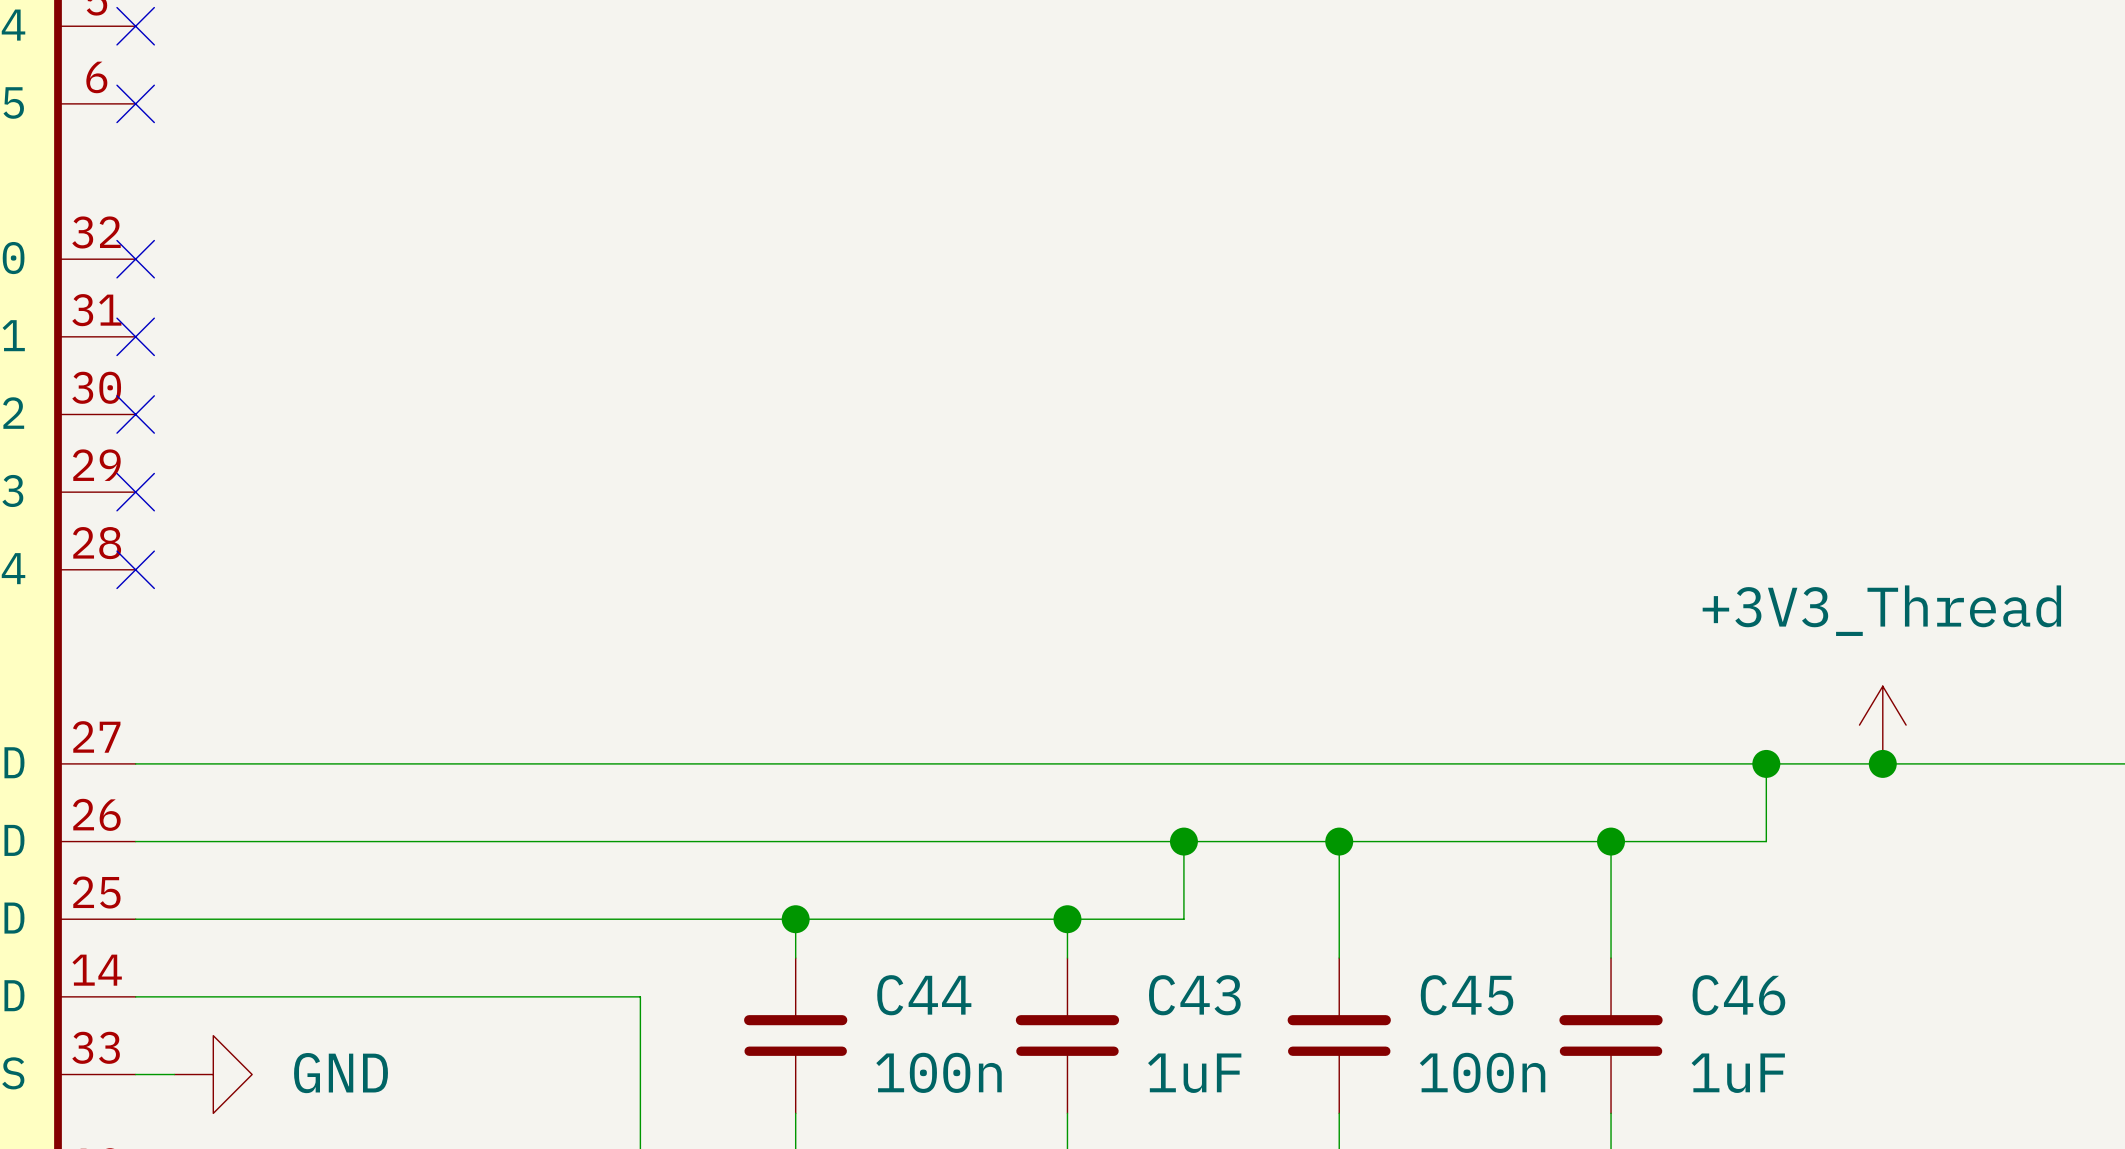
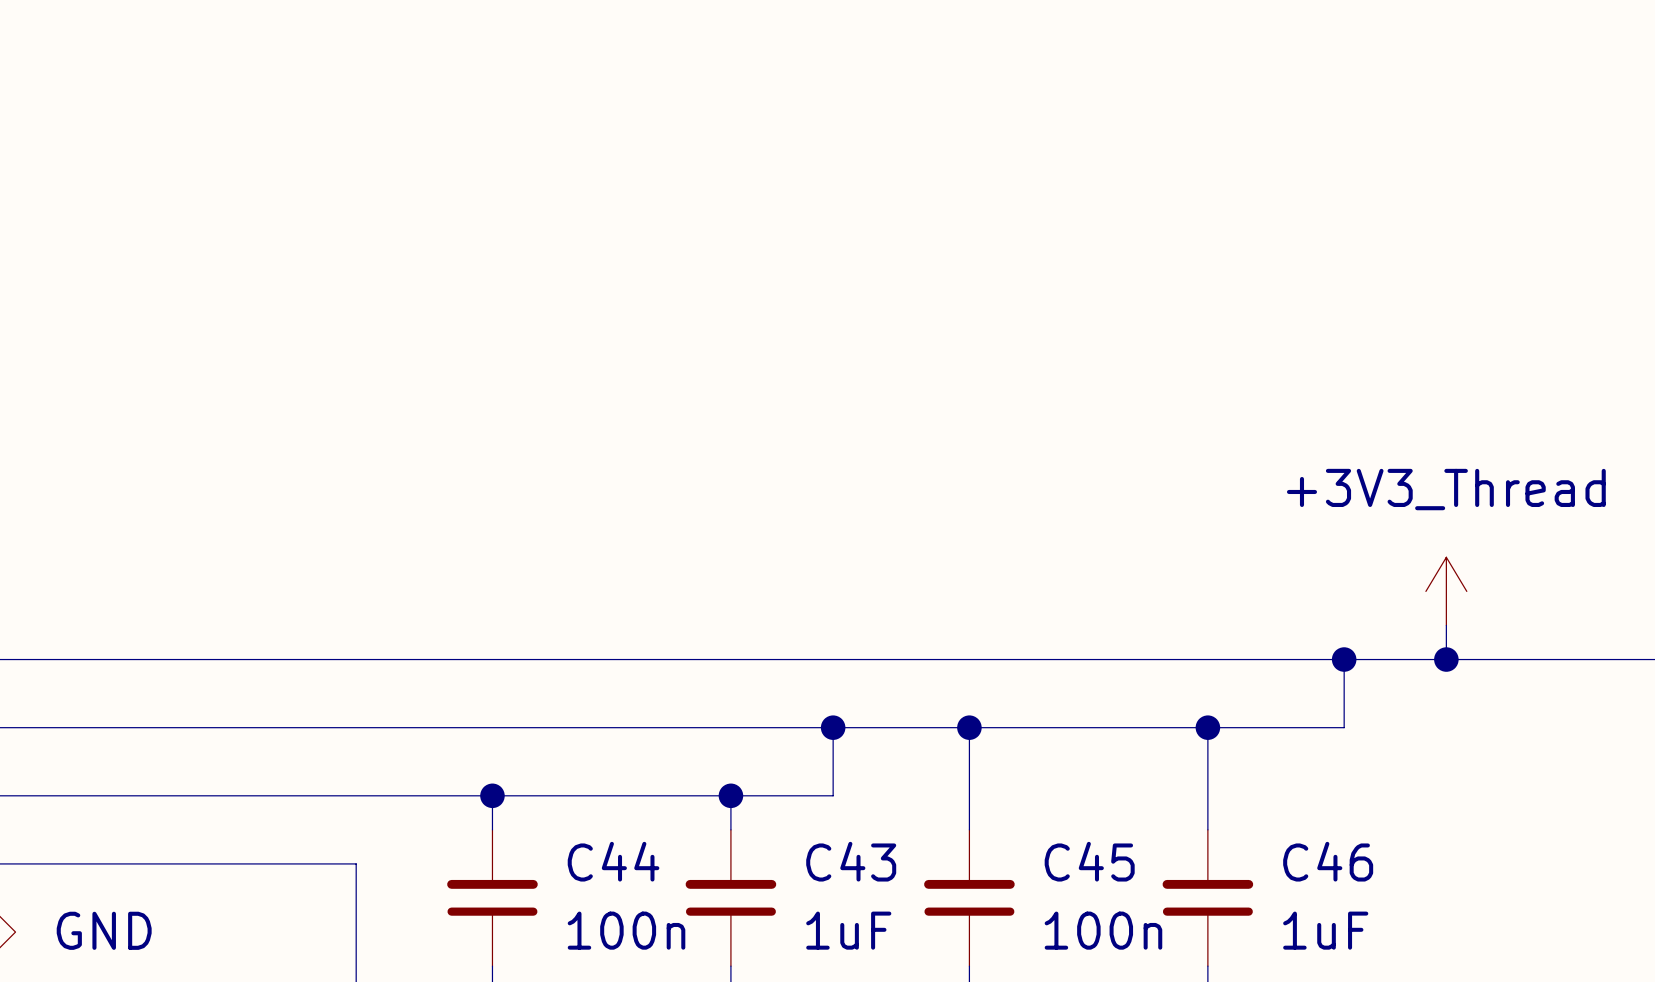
power symbol position: +3V3_Thread (1882, 725) -> +3V3_Thread (1446, 591)

